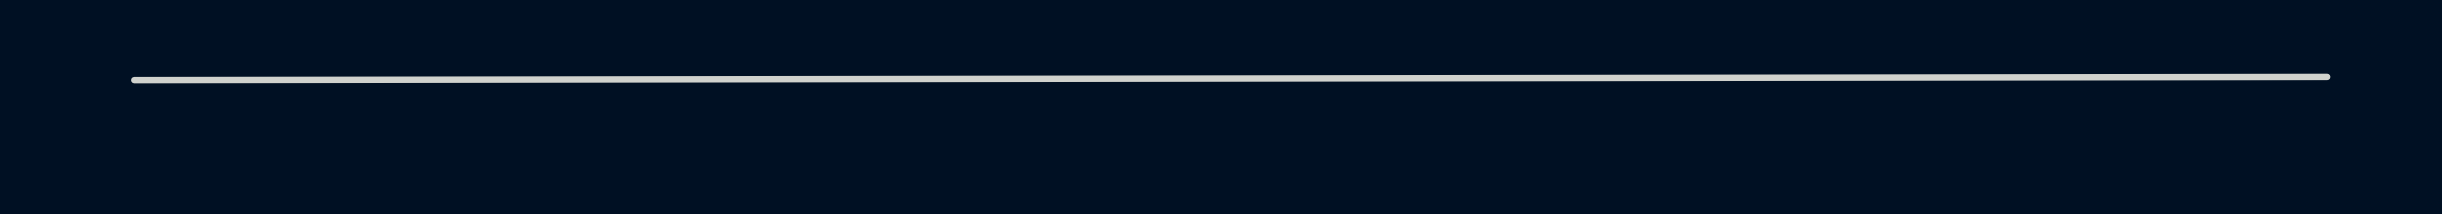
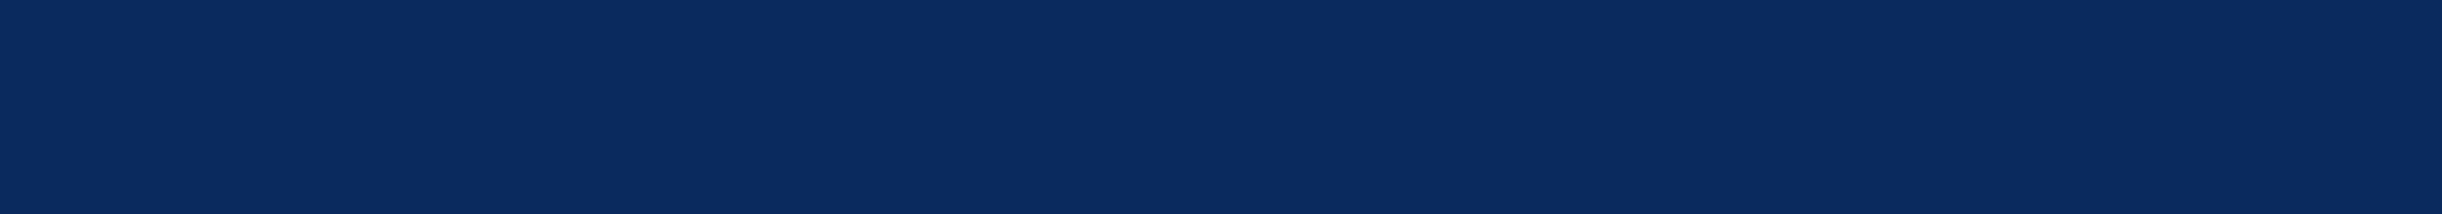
board edge: (2327, 76) (134, 80) -> none

